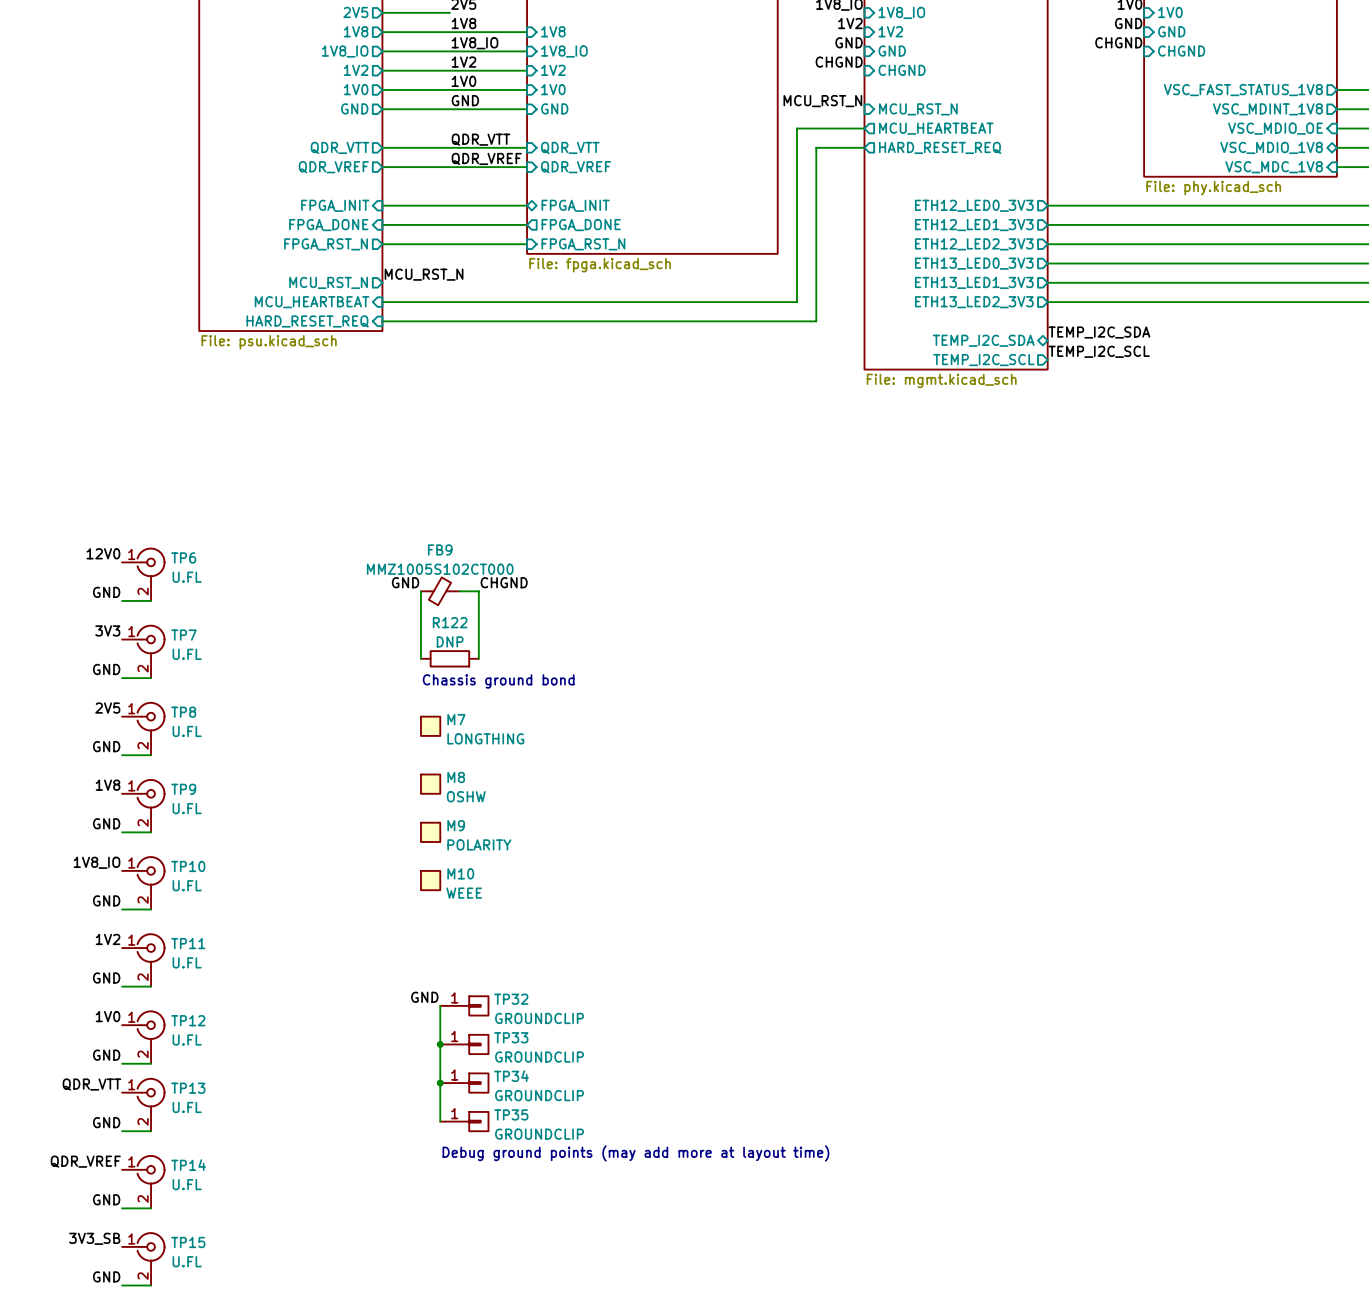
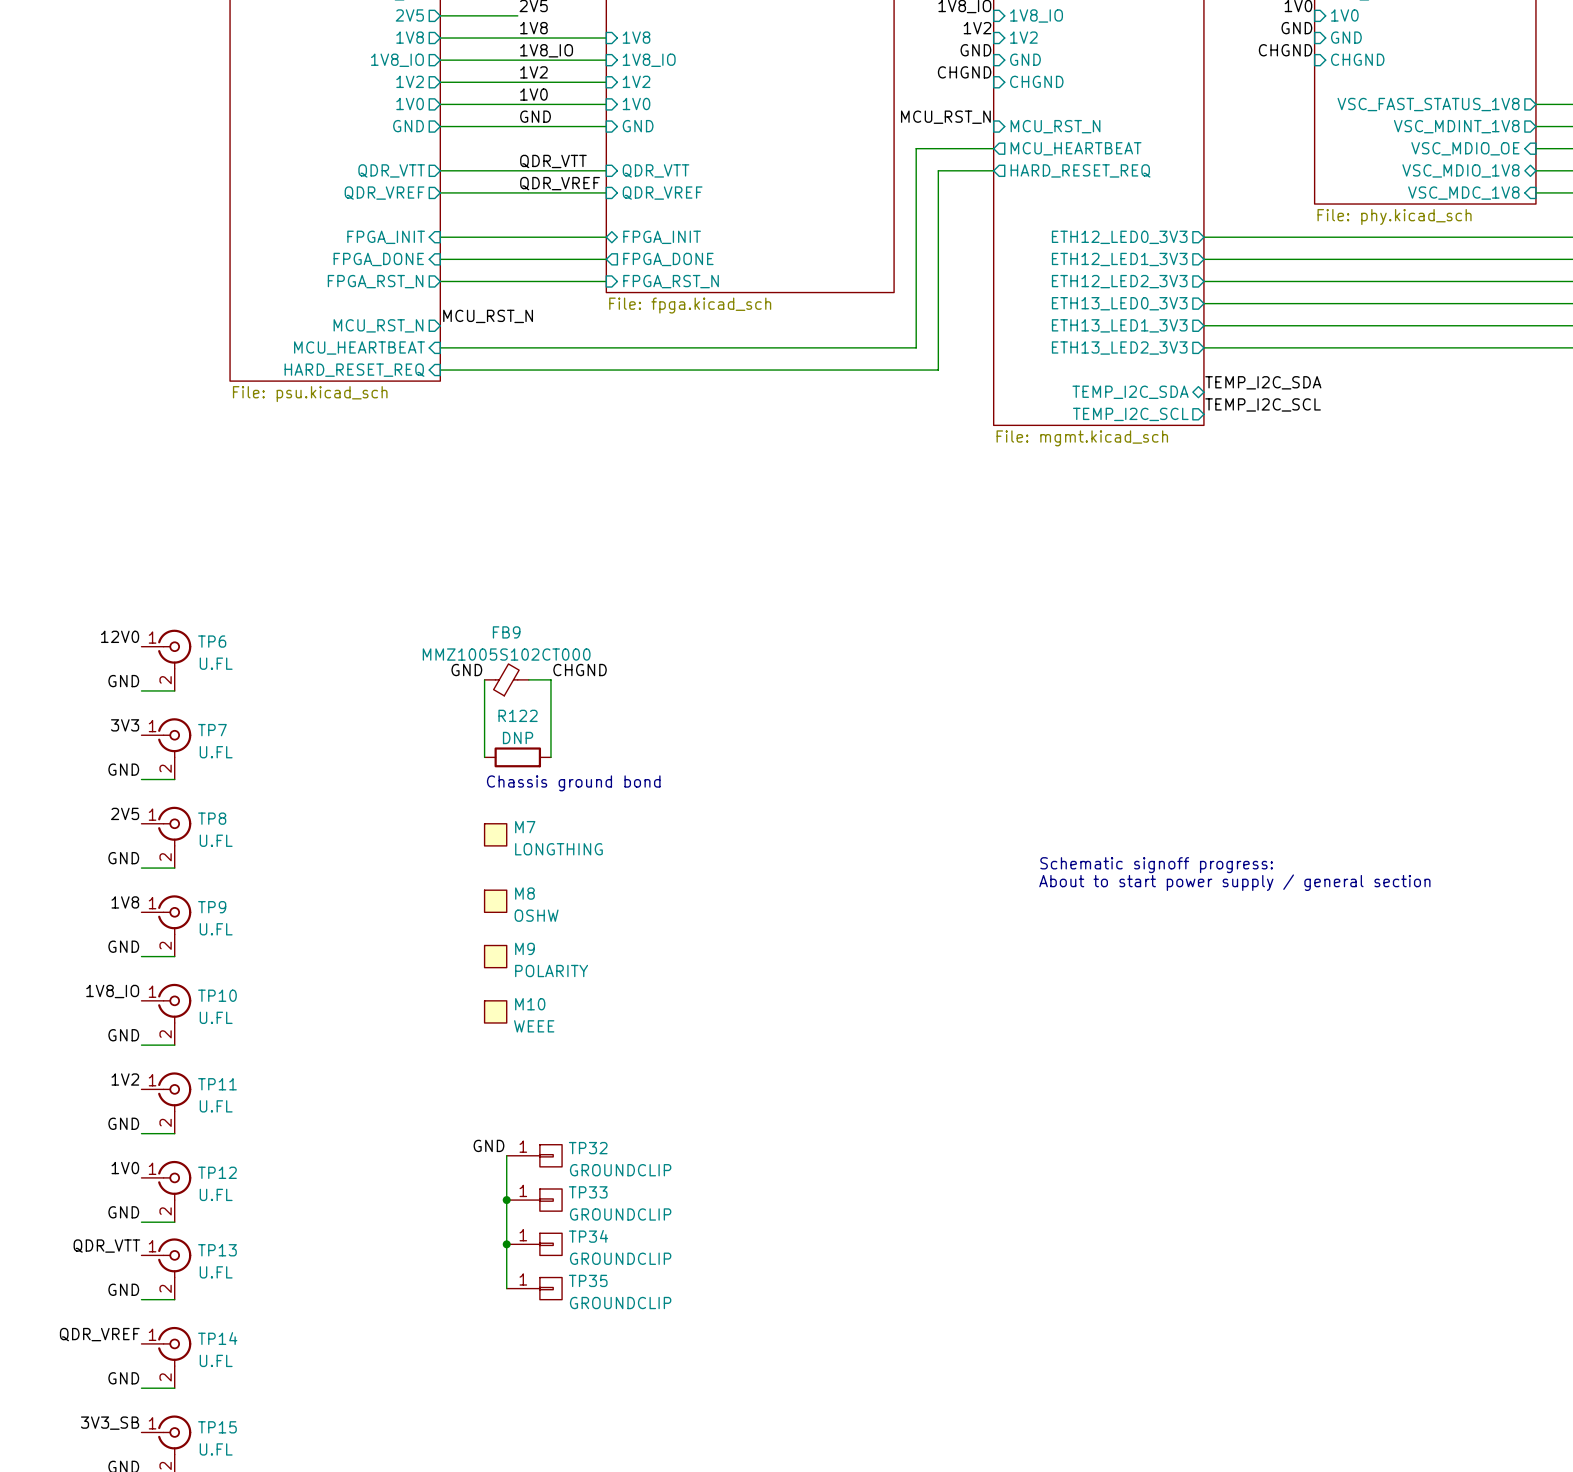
text: none -> Schematic signoff progress: (1156, 865)
text: none -> About to start power supply / general section (1234, 882)
text: Debug ground points (may add more at layout time) (635, 1153) -> none

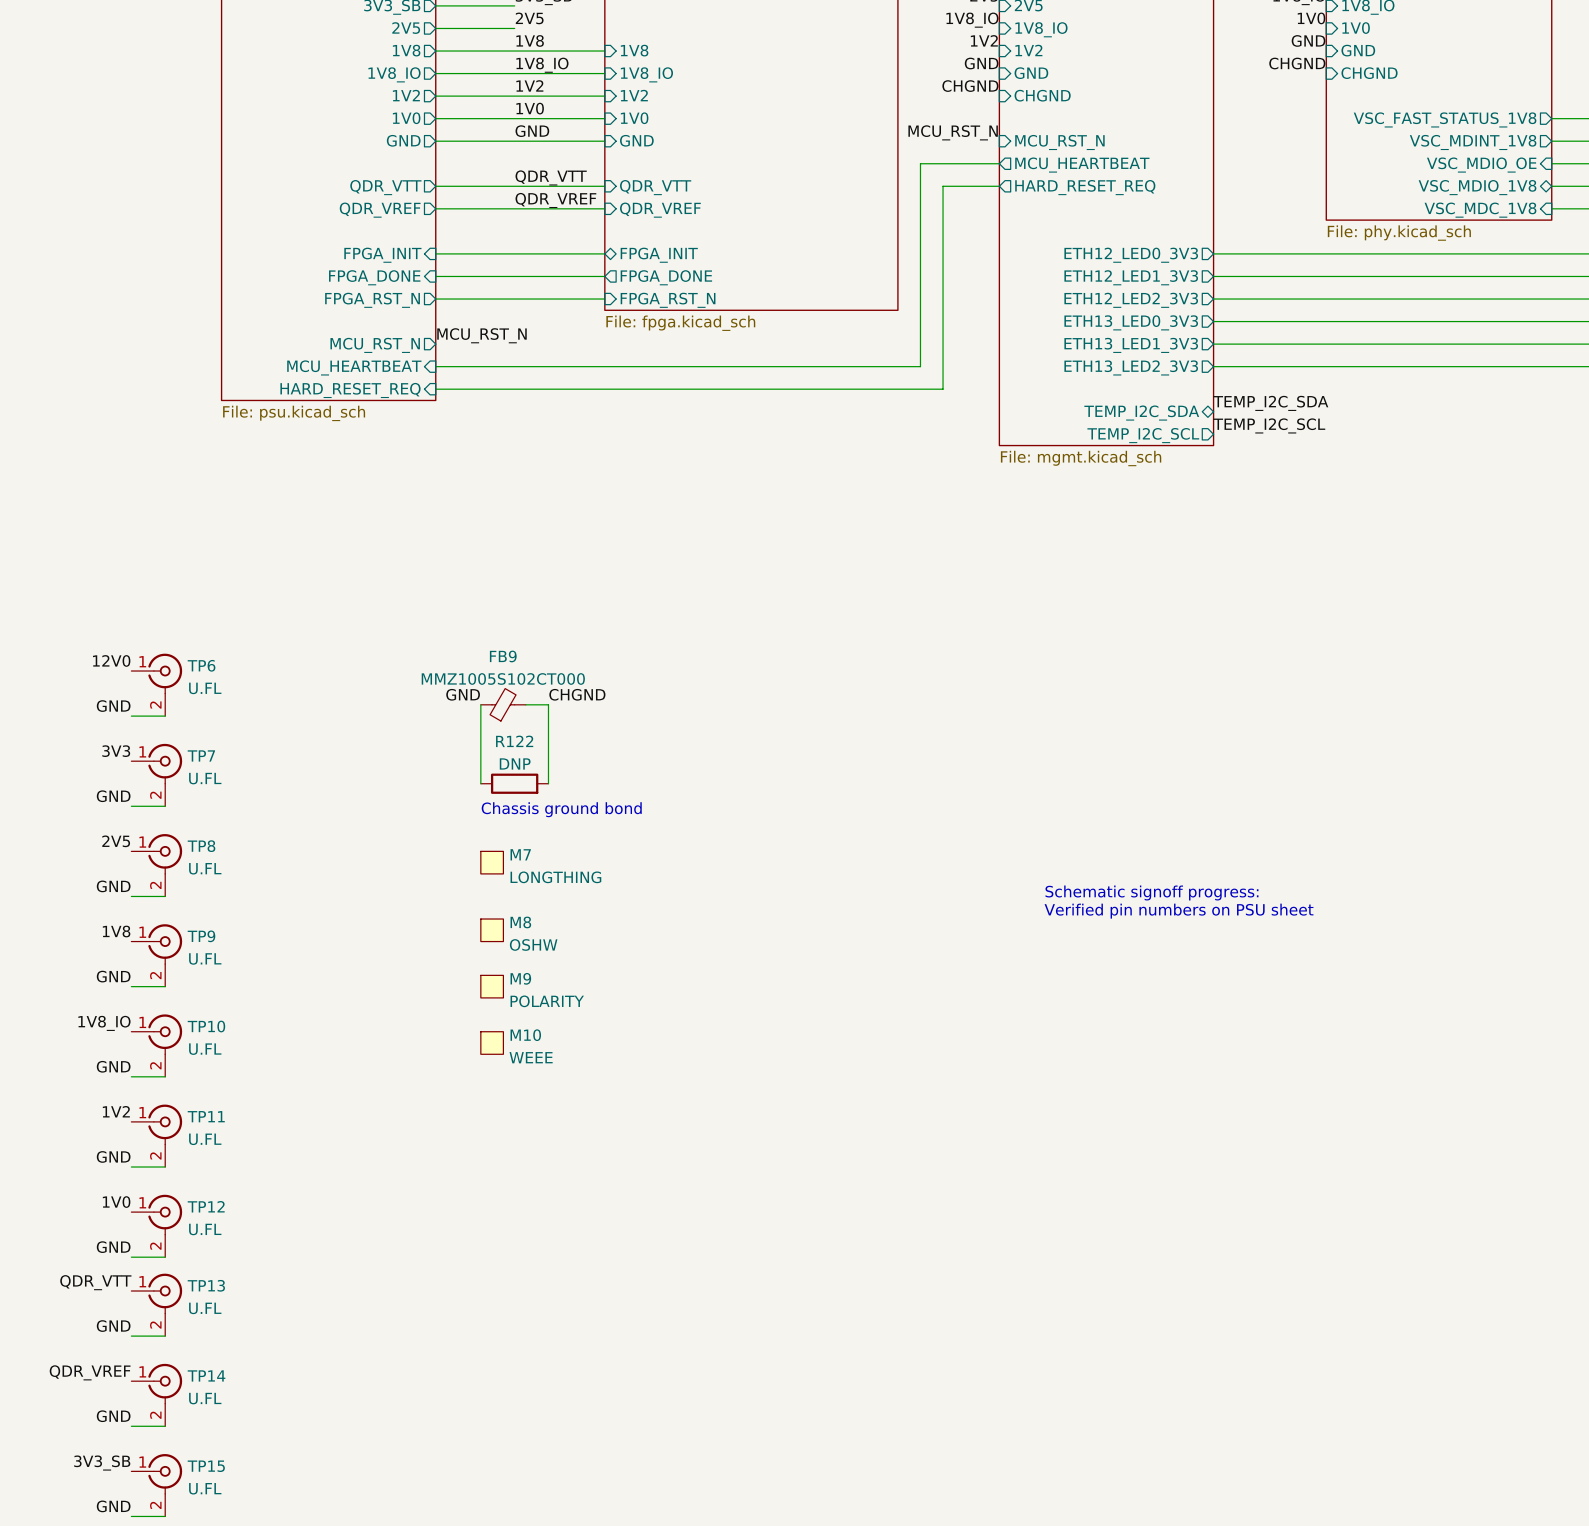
text: About to start power supply / general section (1234, 882) -> Verified pin numbers on PSU sheet (1179, 911)
label: GND (488, 1145) -> none
wire: (506, 1155) (506, 1288) -> none
TP32: GROUNDCLIP (534, 1155) -> none
junction: (506, 1200) -> none
TP33: GROUNDCLIP (534, 1200) -> none
junction: (506, 1244) -> none
TP34: GROUNDCLIP (534, 1244) -> none
TP35: GROUNDCLIP (534, 1288) -> none

